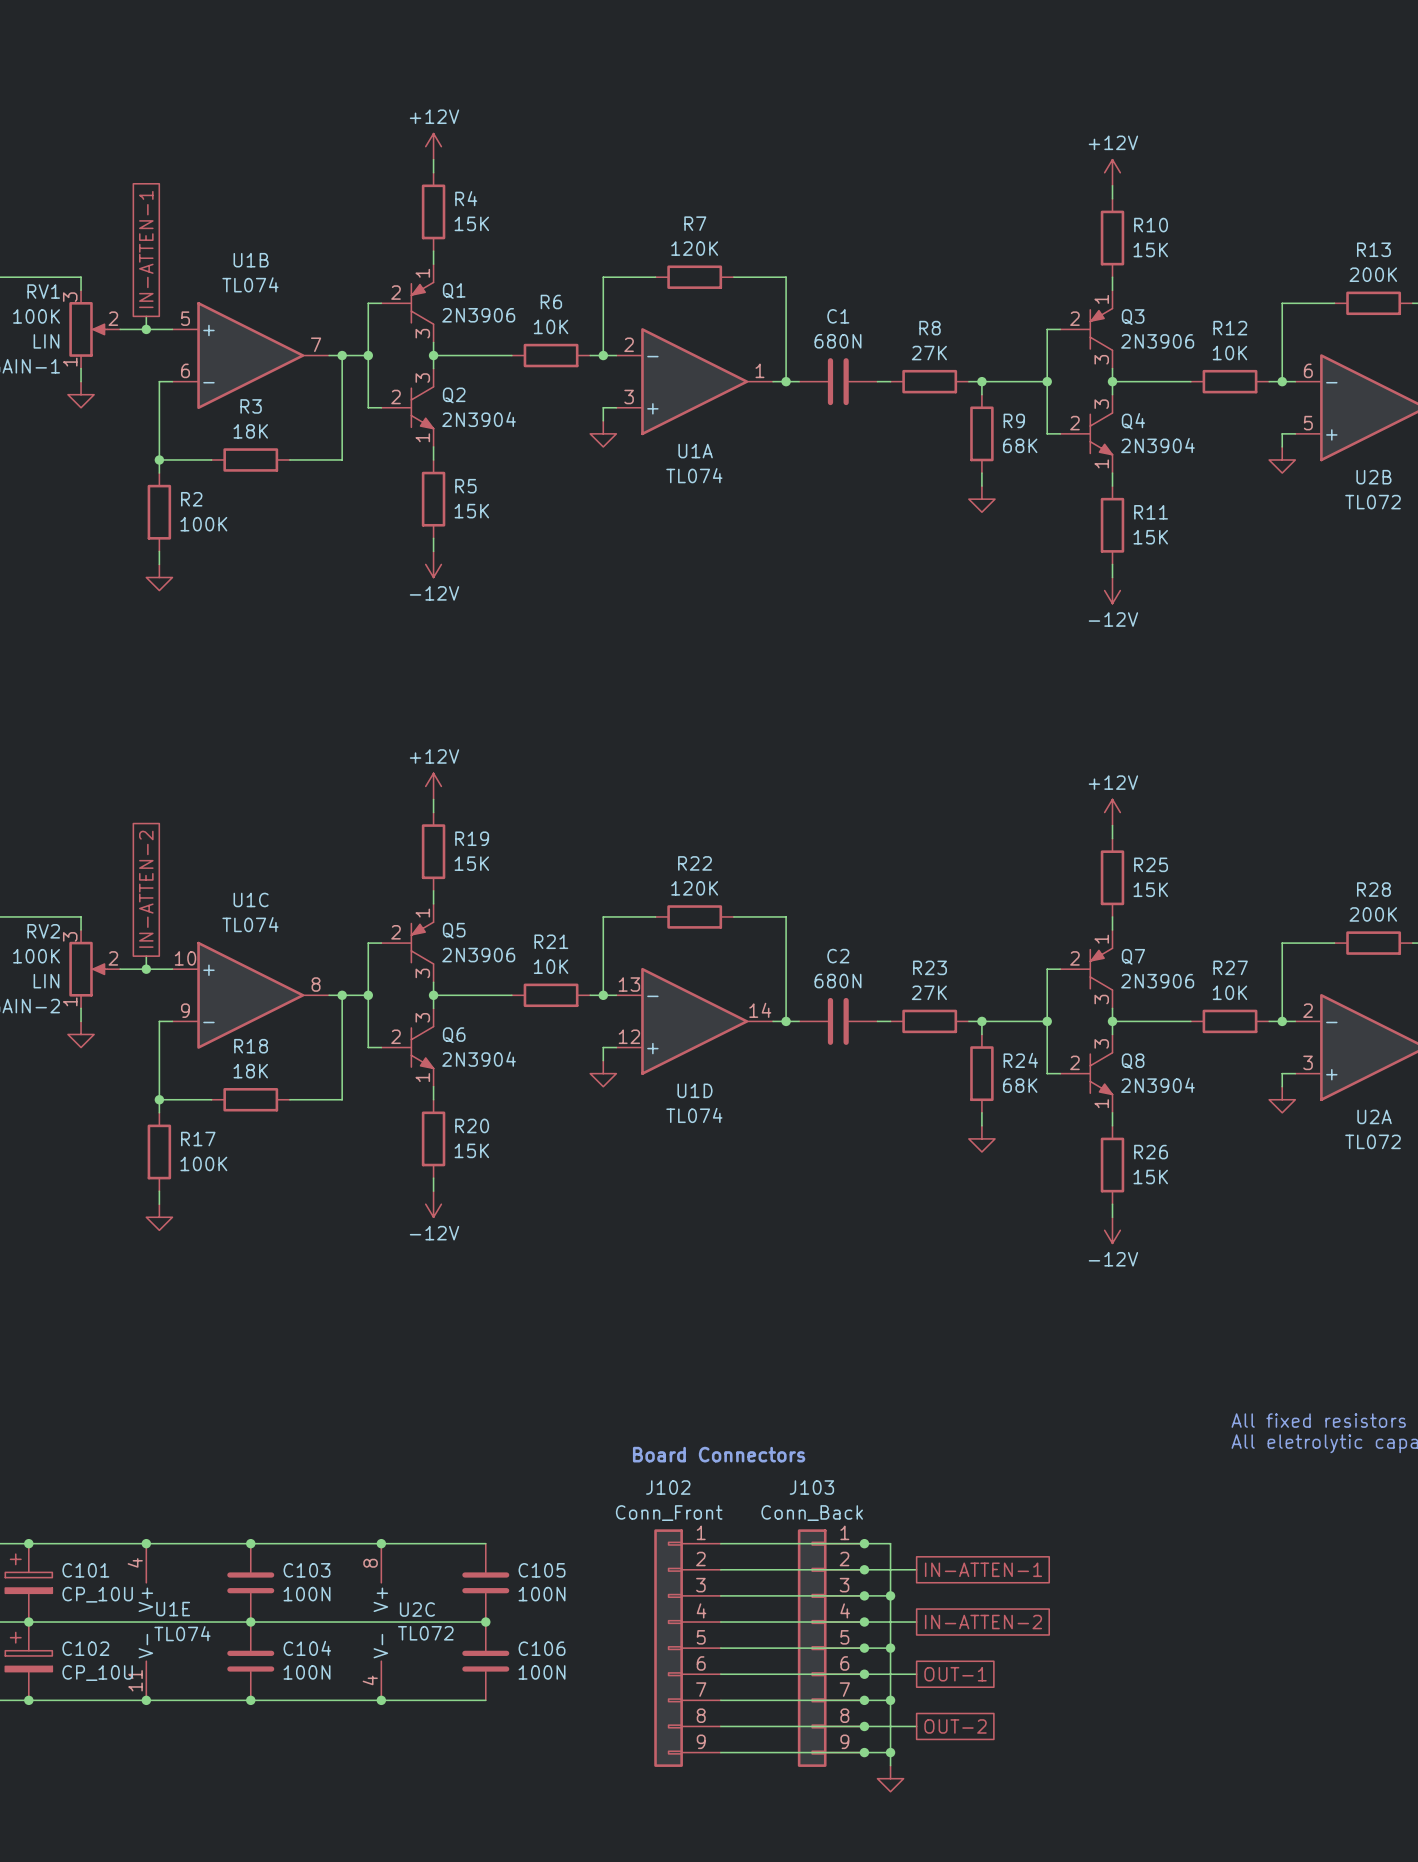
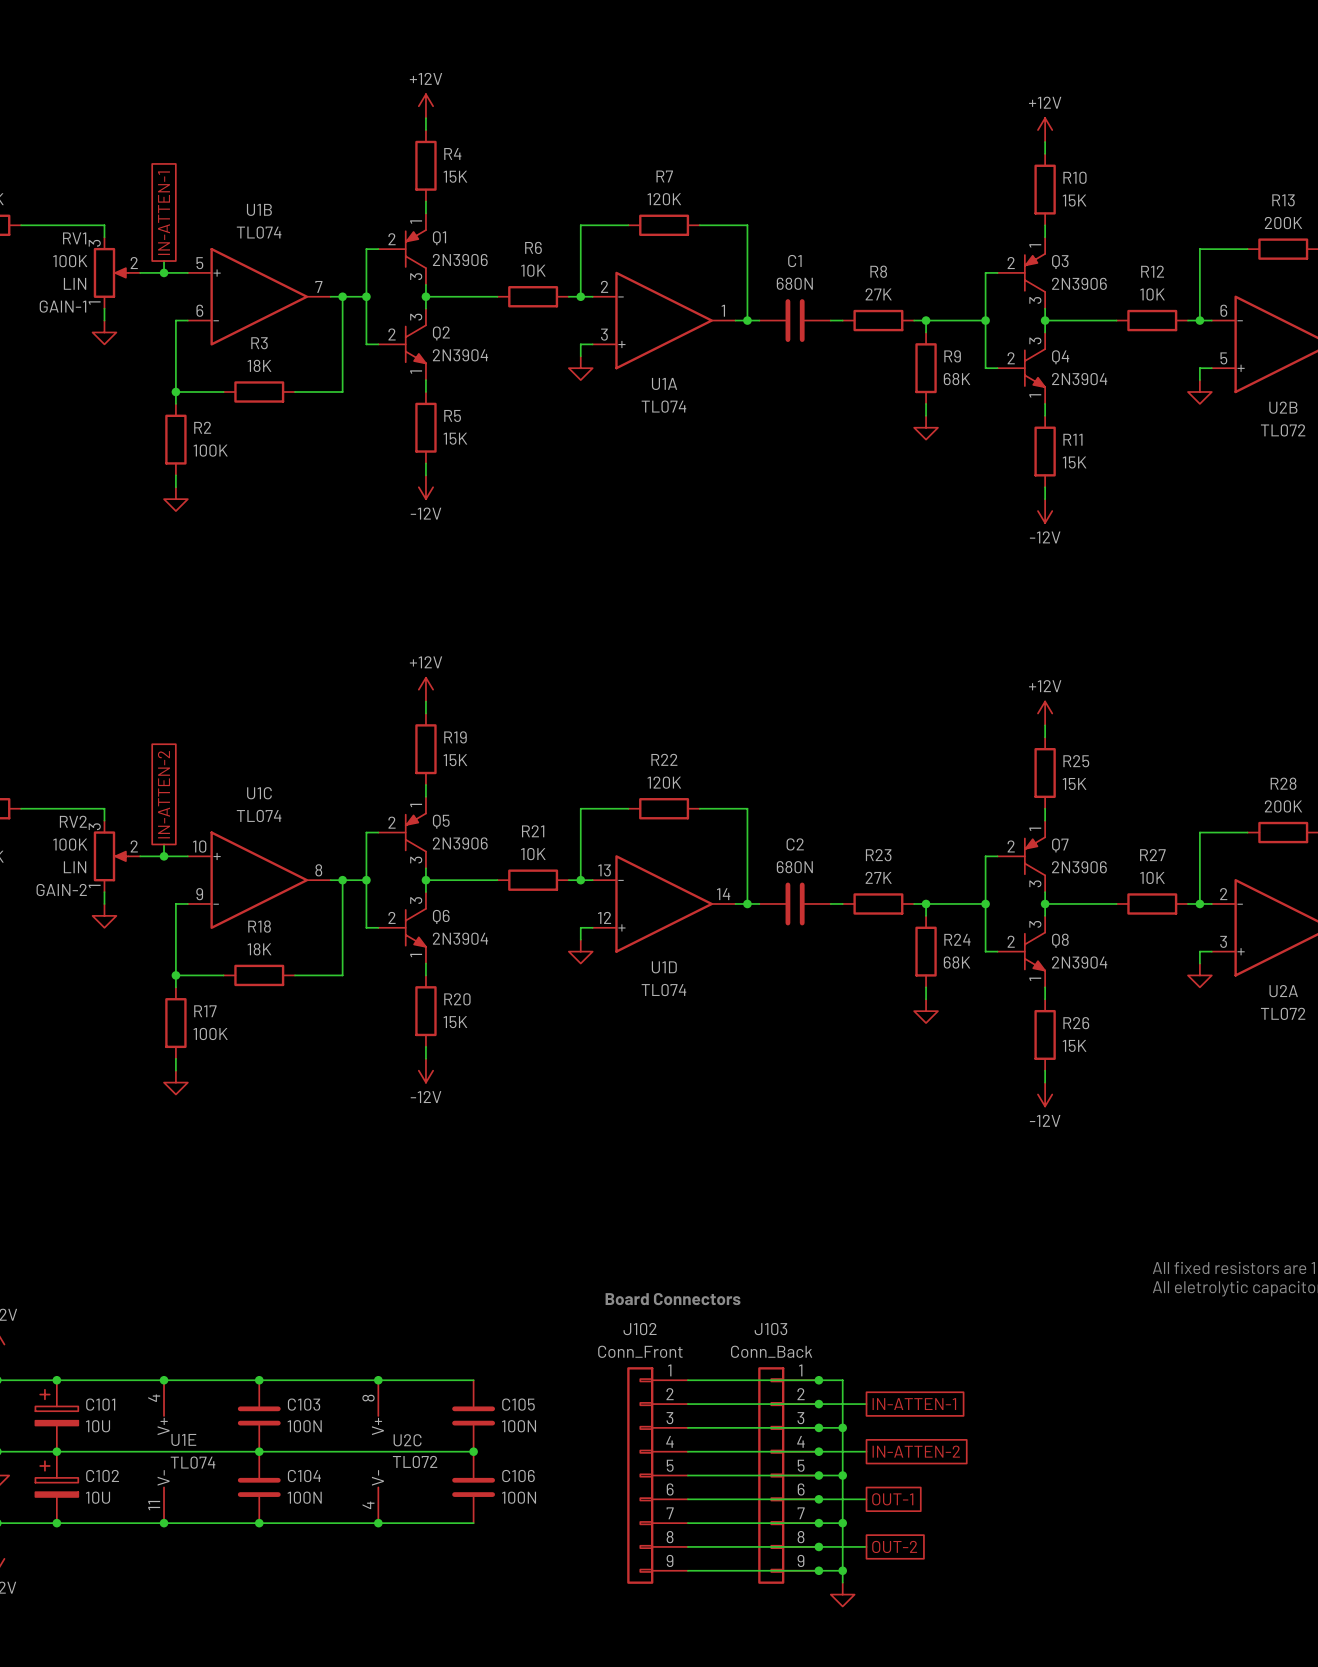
C101 value: CP_10U (97, 1594) -> 10U (98, 1426)
C102 value: CP_10U (97, 1673) -> 10U (98, 1497)

